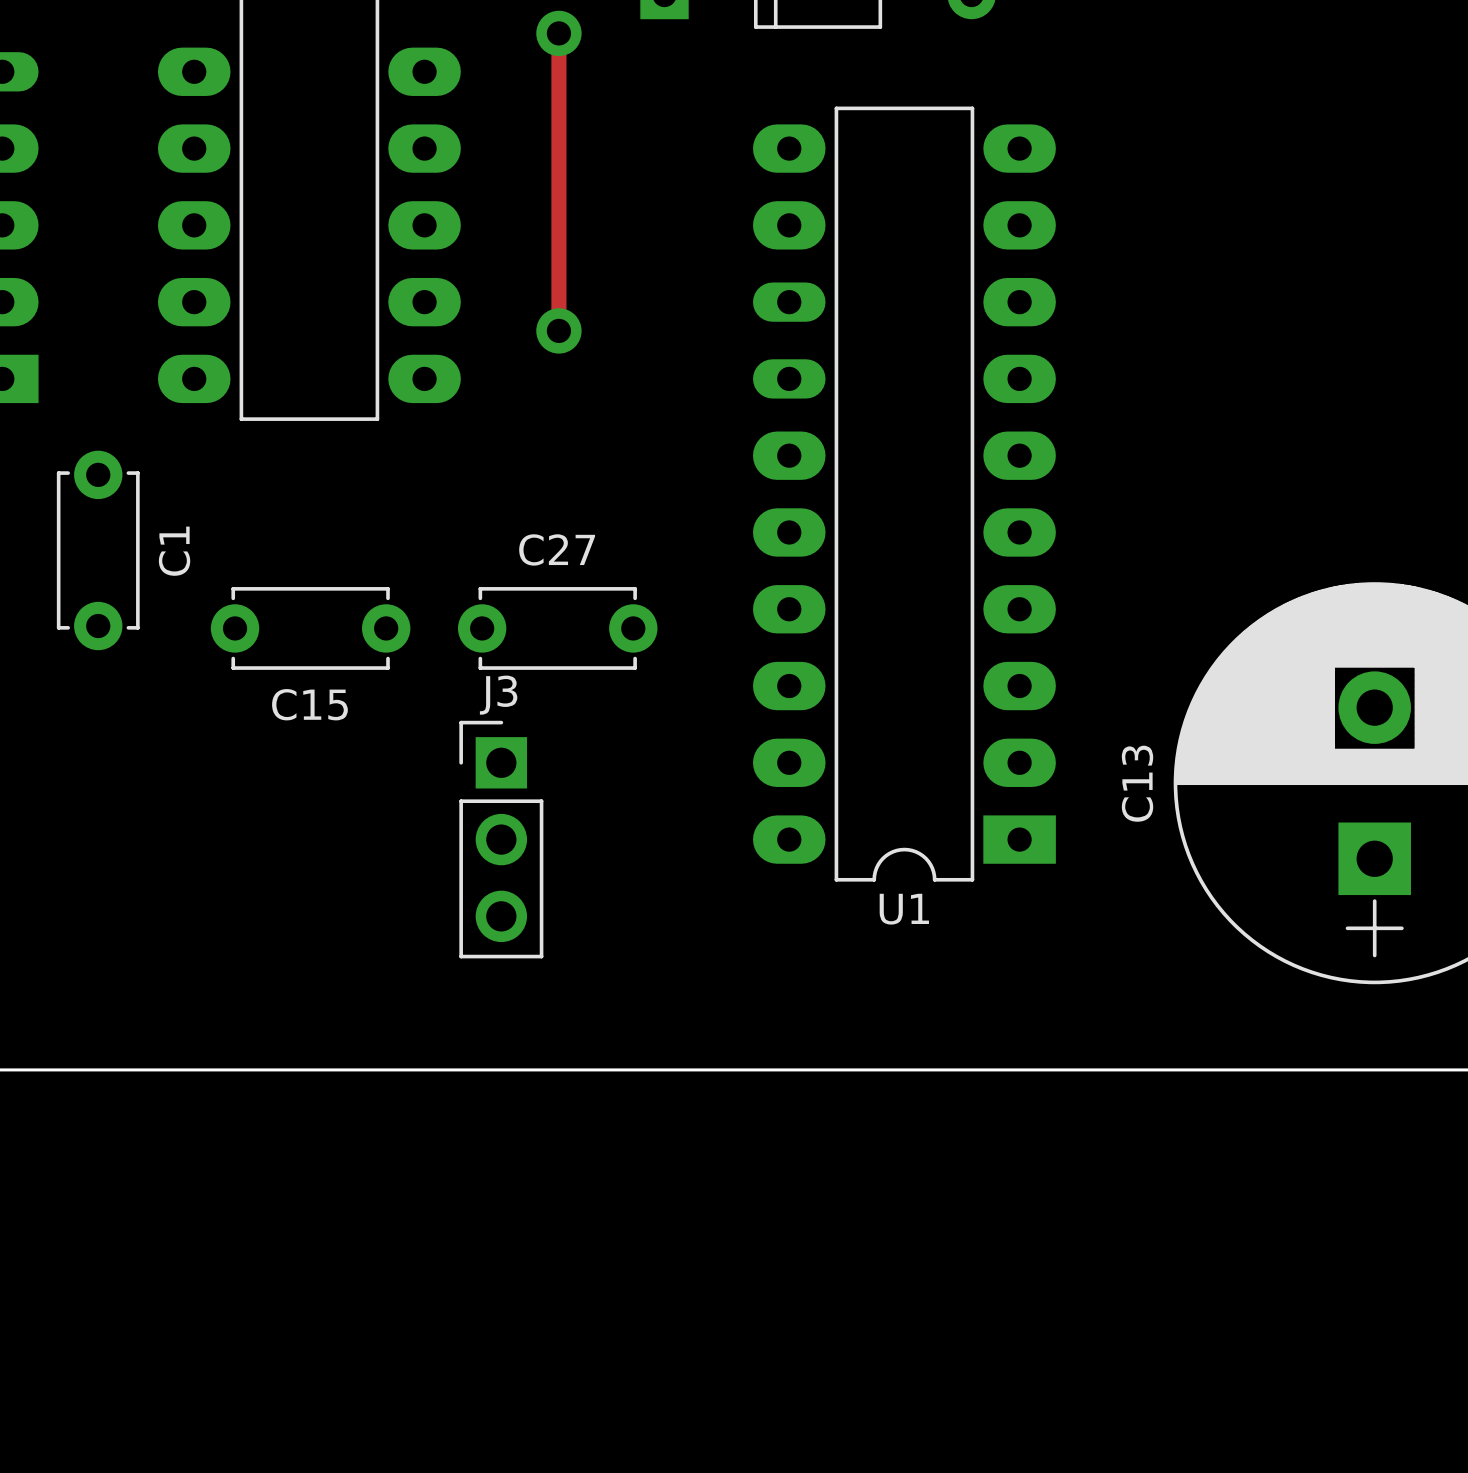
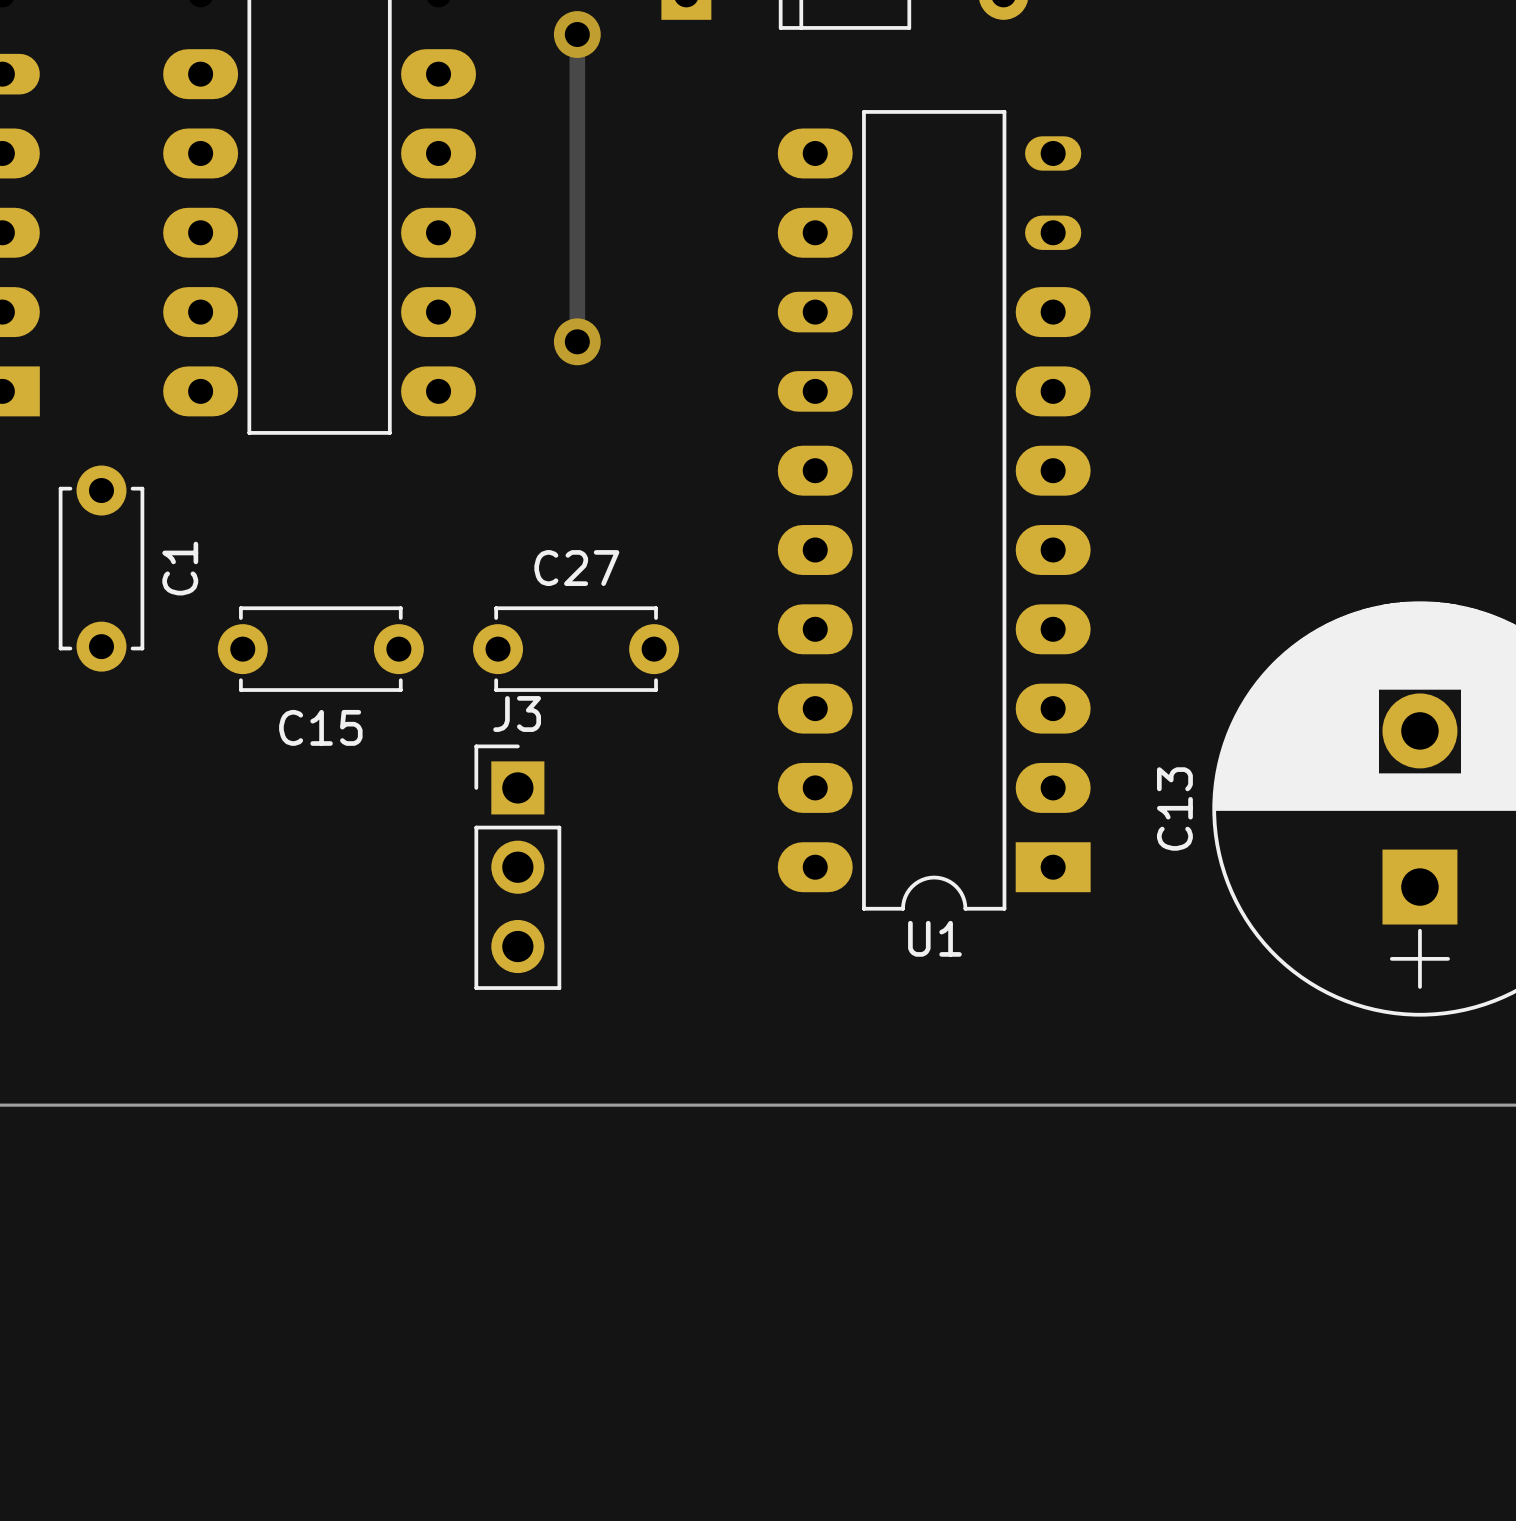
U1 footprint: [753, 106, 1056, 882] -> [777, 110, 1091, 911]

